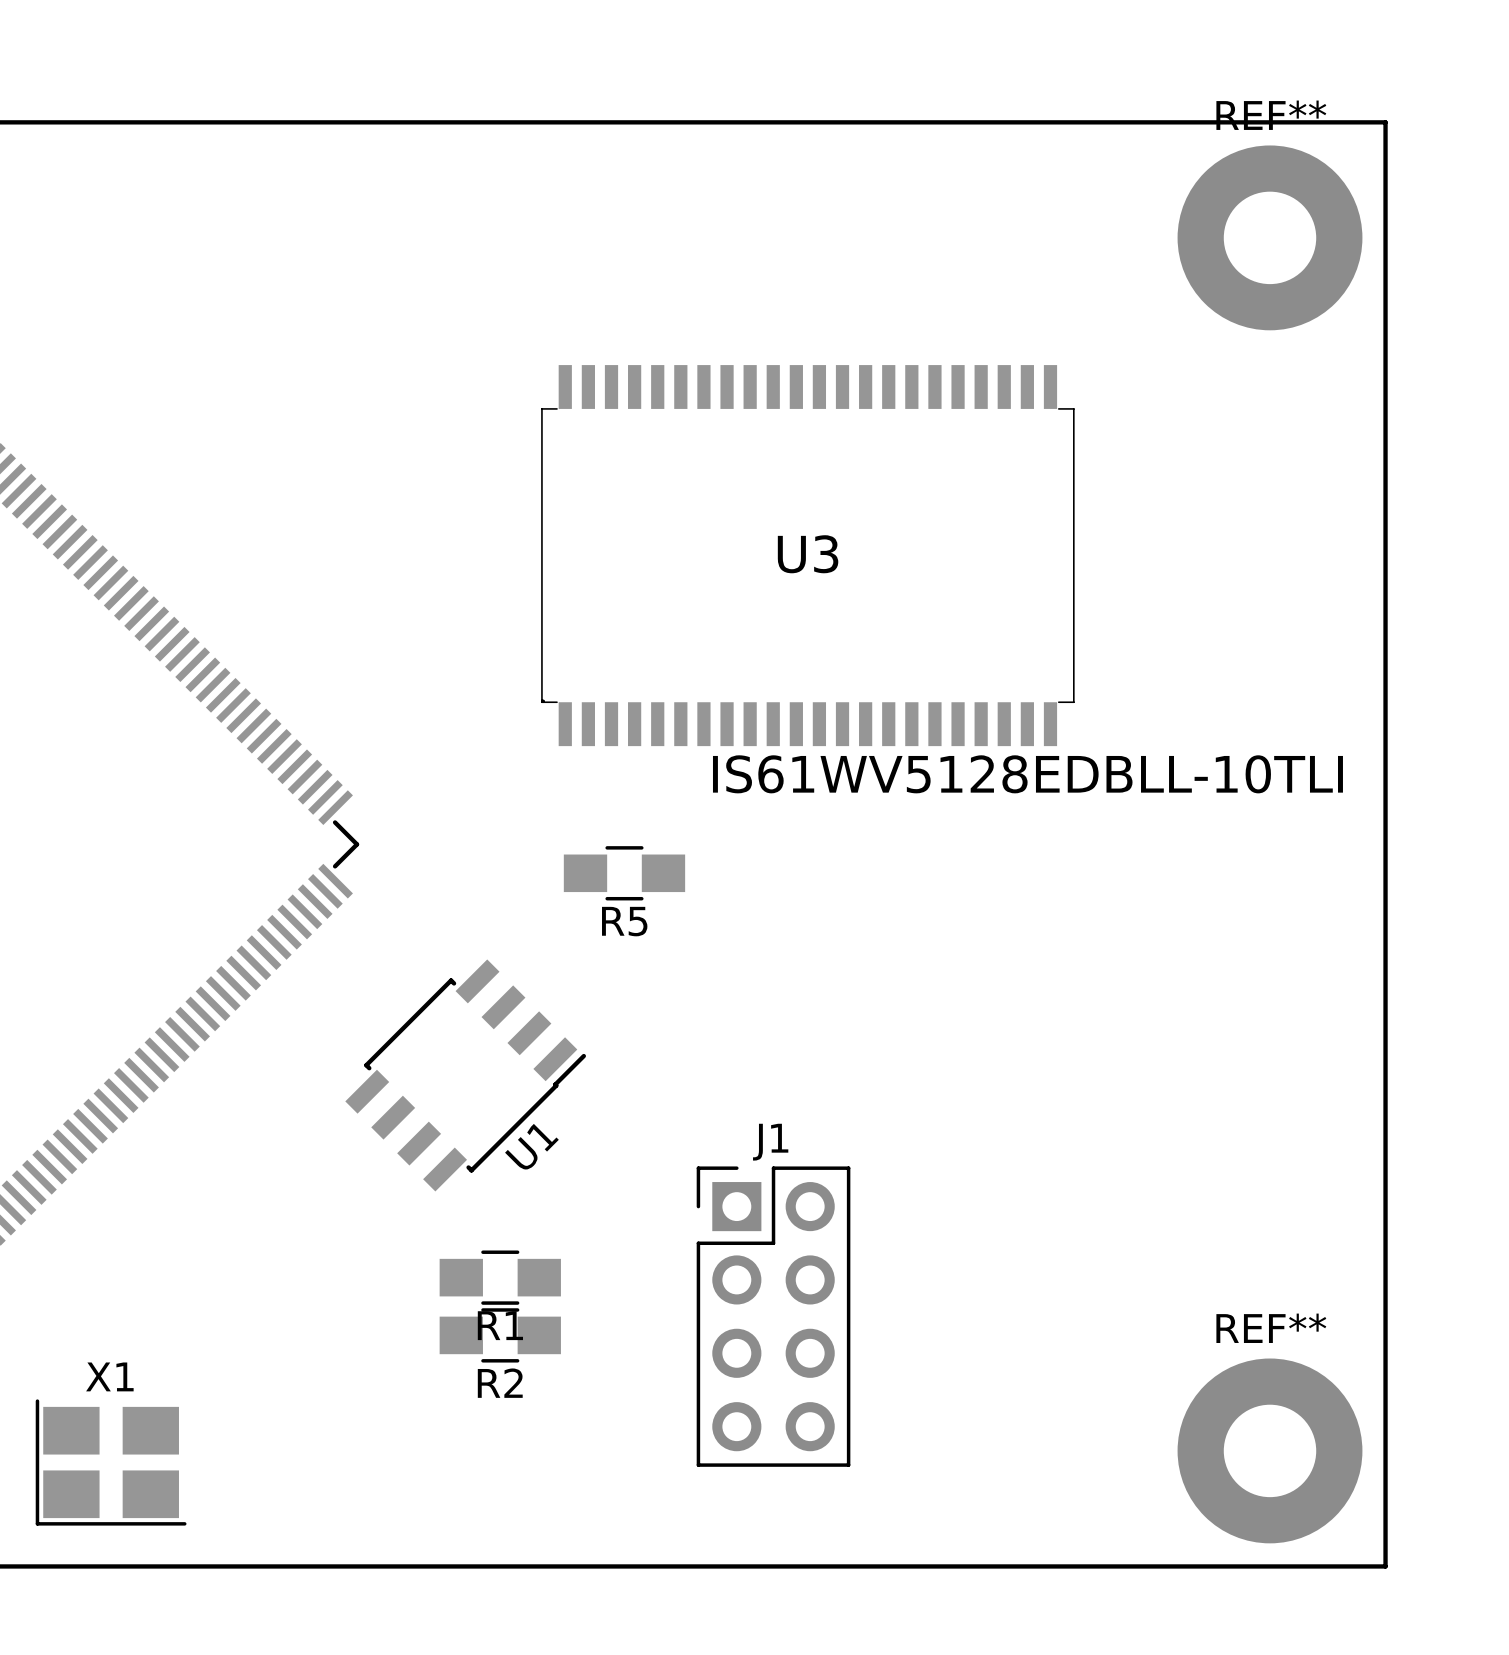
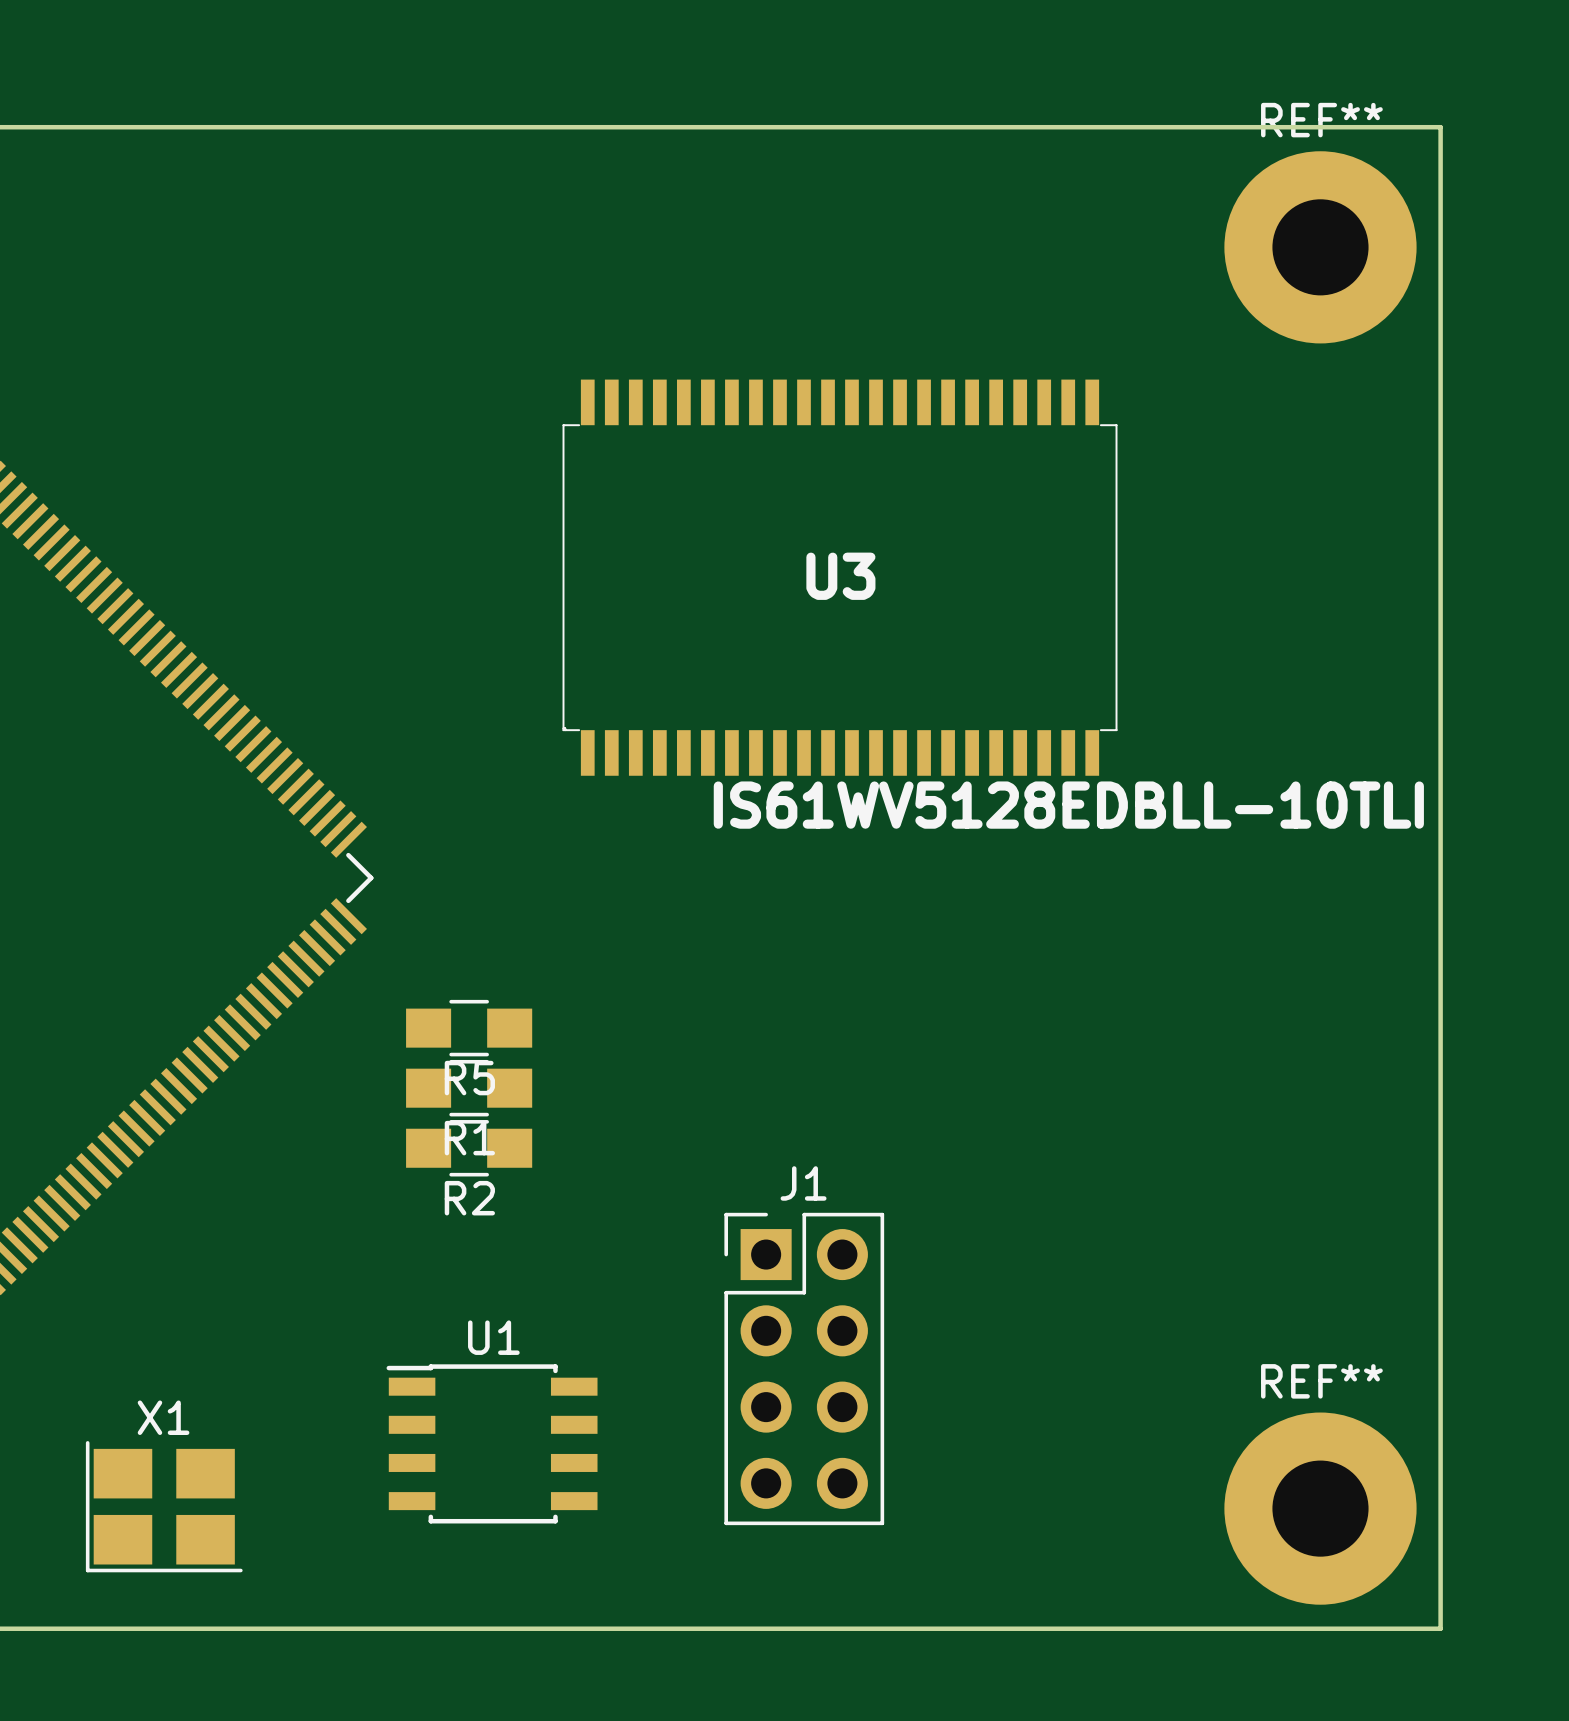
R5 position: (624, 873) -> (469, 1028)
U1 rotation: 0° (465, 1075) -> 135° counterclockwise (492, 1443)
U1 position: (465, 1075) -> (492, 1443)
R1 position: (500, 1277) -> (469, 1088)
R2 position: (500, 1335) -> (469, 1148)
X1 position: (111, 1462) -> (164, 1506)

